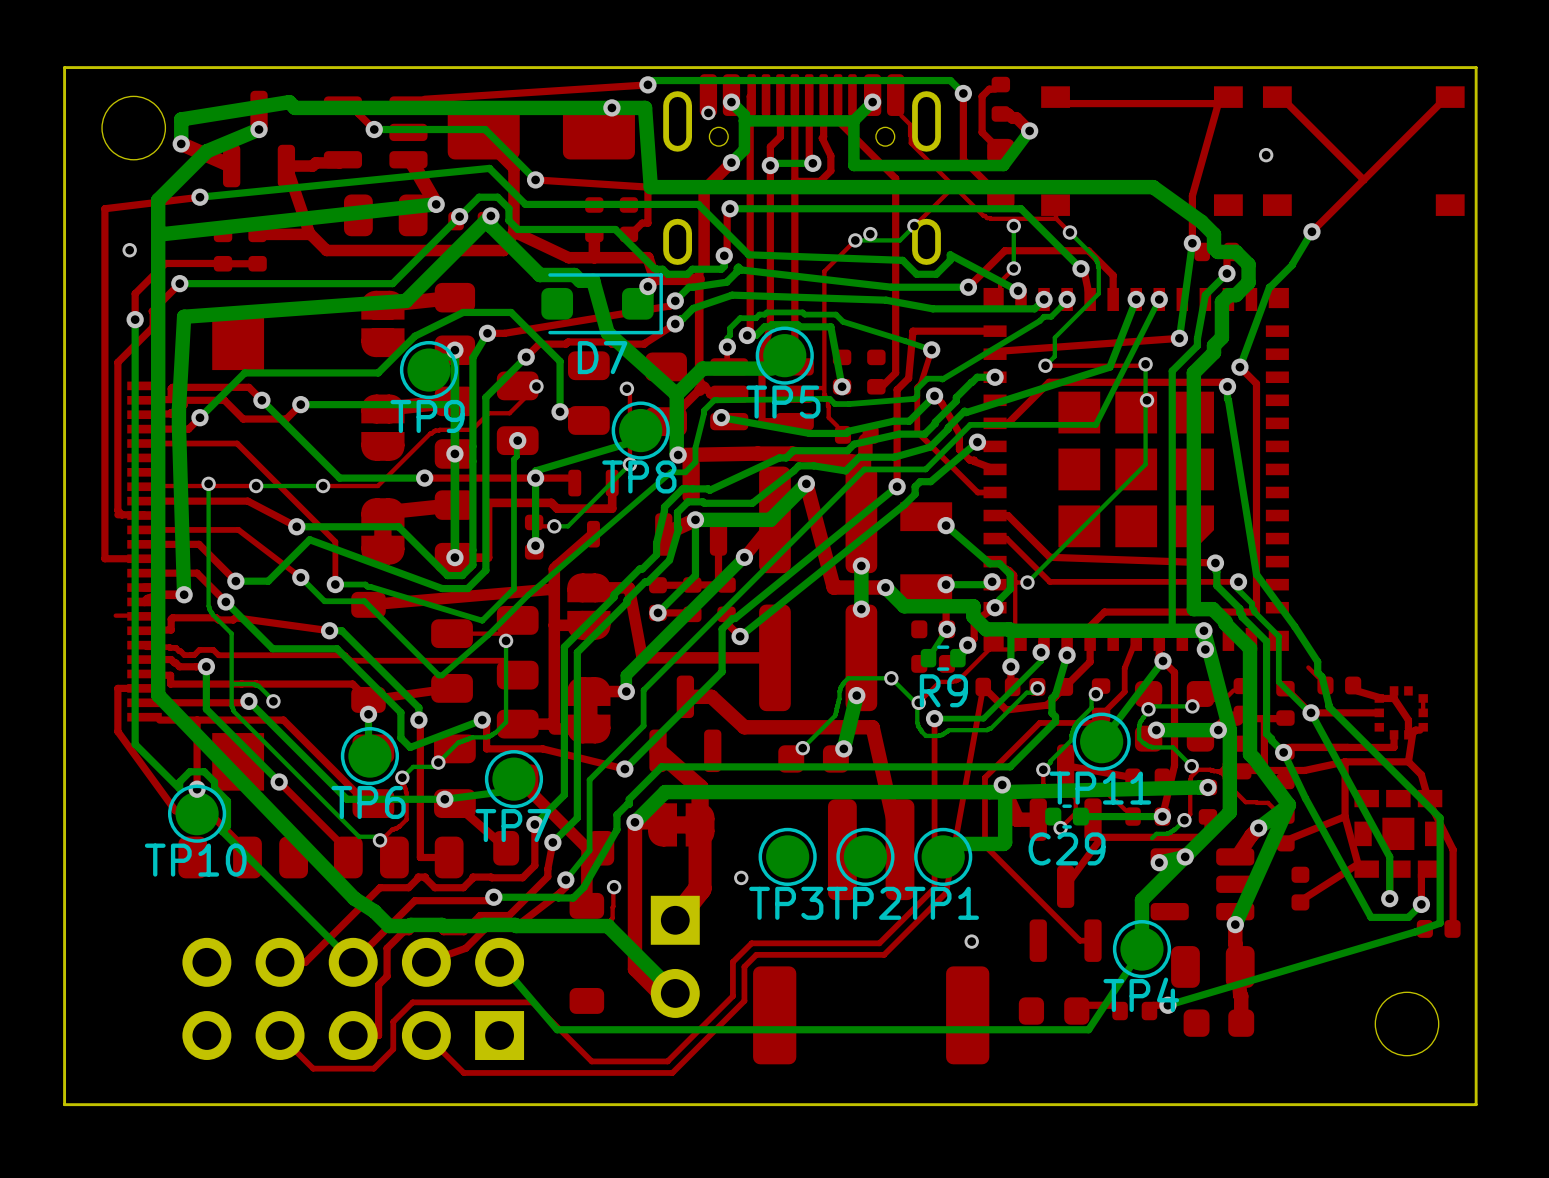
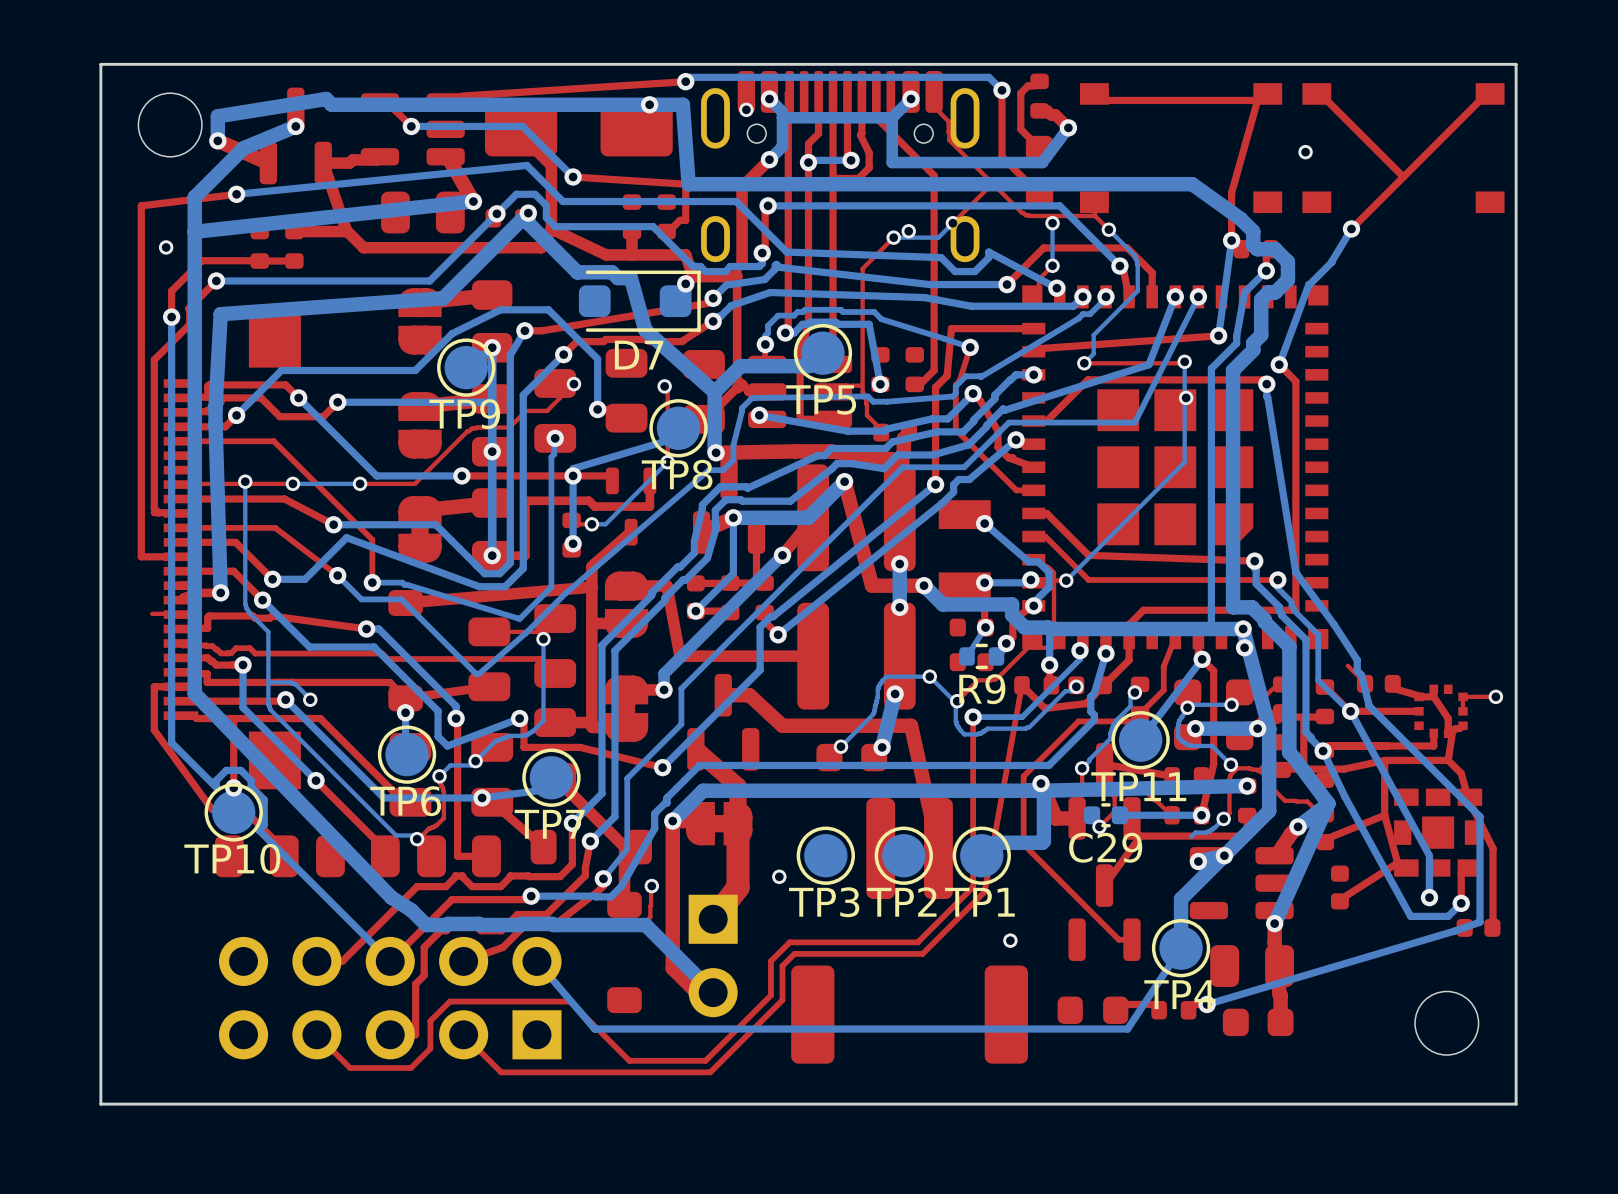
top track: none -> (1495, 696) (1462, 696)
via: none -> (1495, 696)

